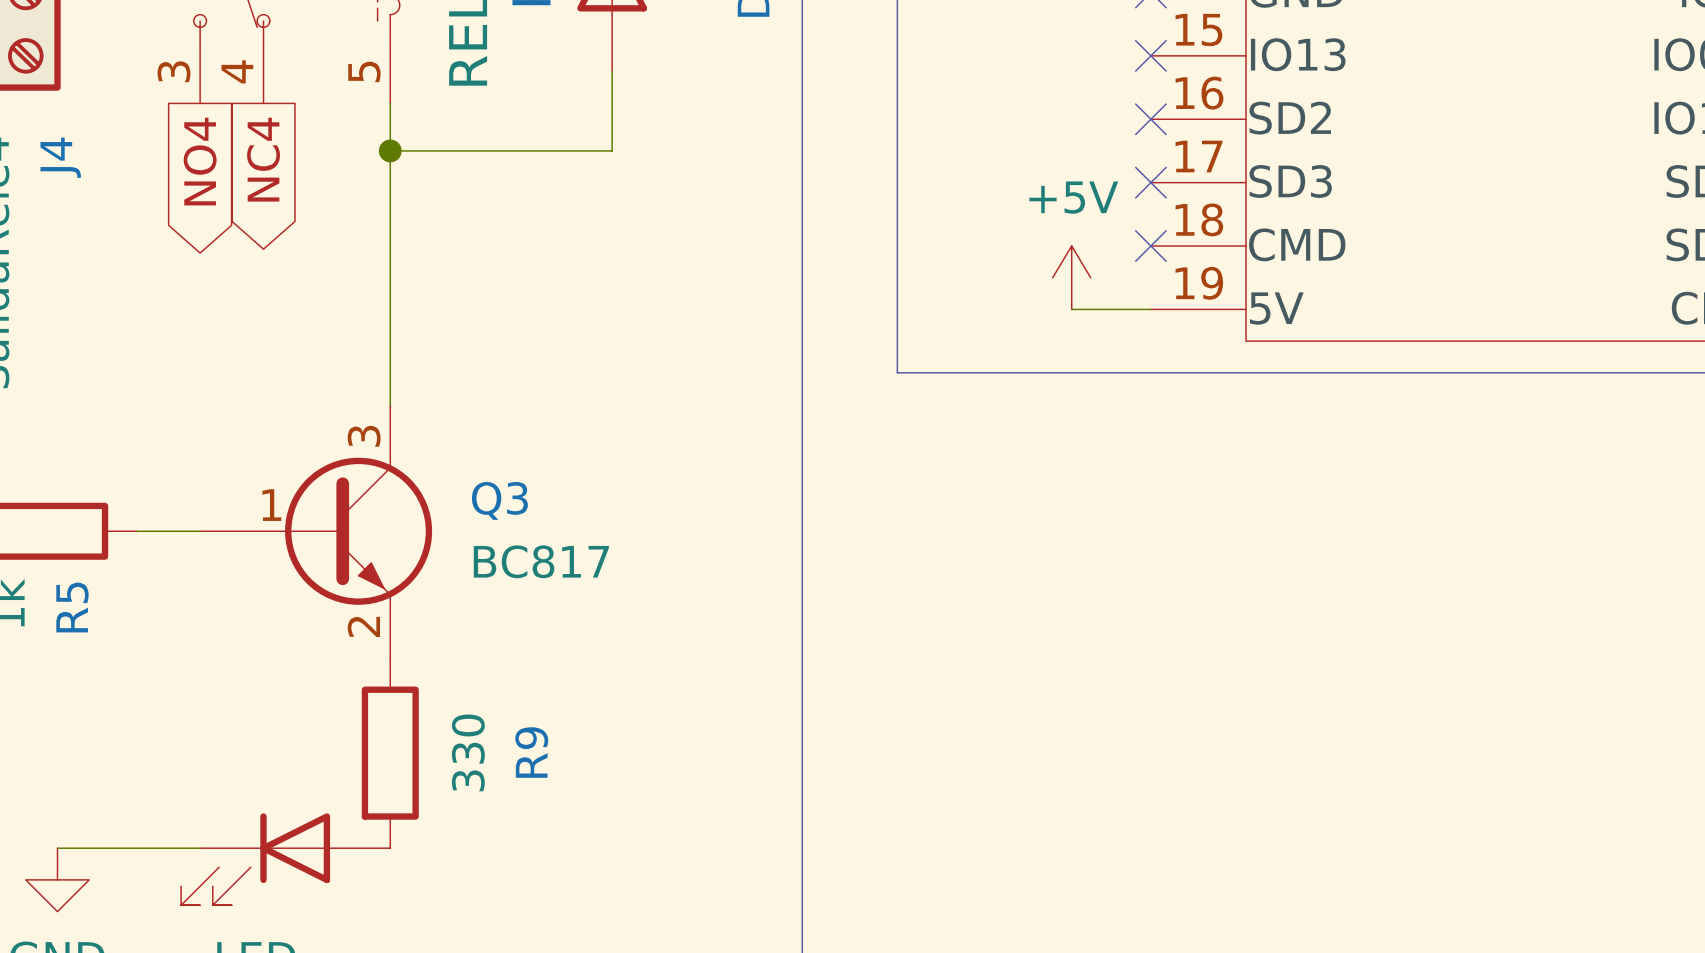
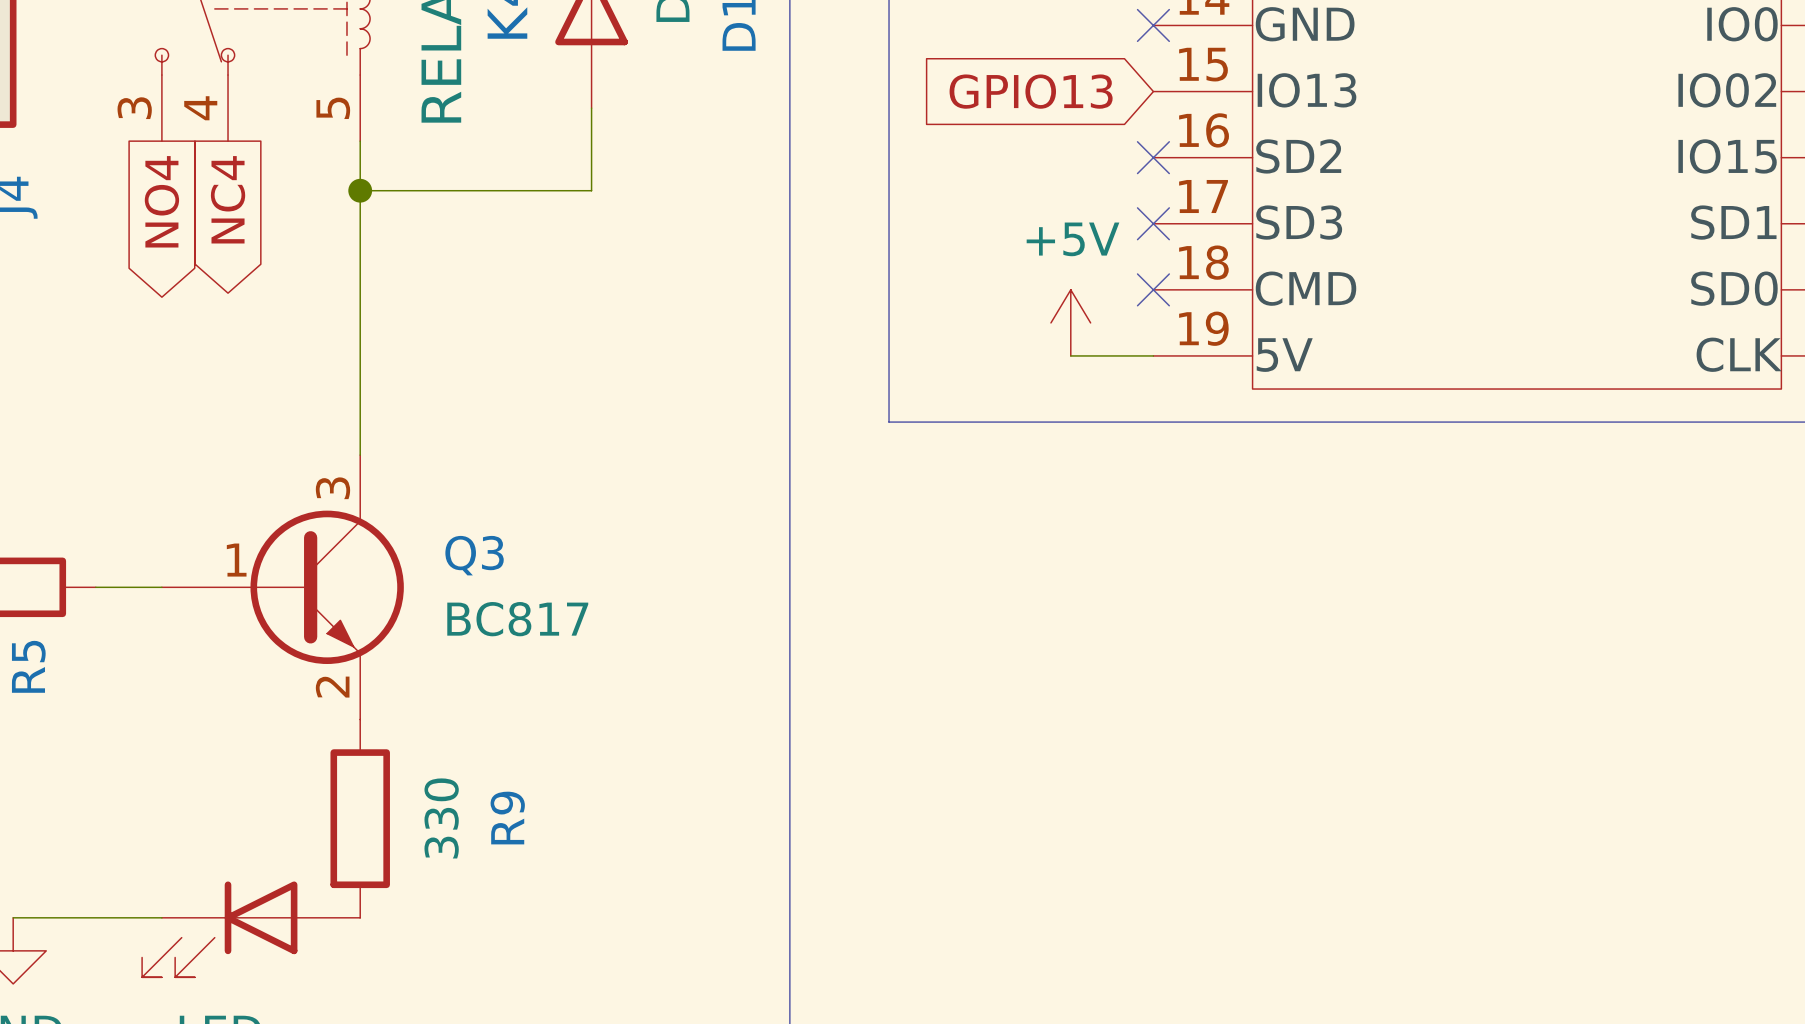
global label: none -> GPIO13 (1031, 91)
no-connect mark: (1150, 55) -> none

